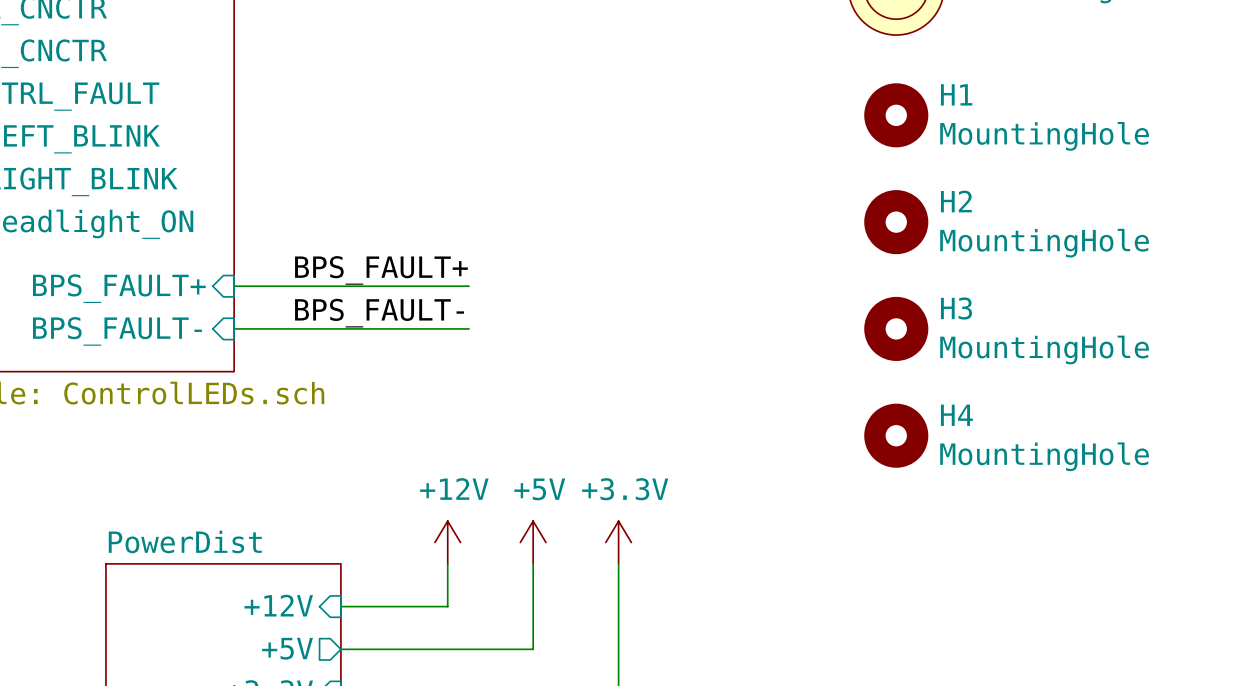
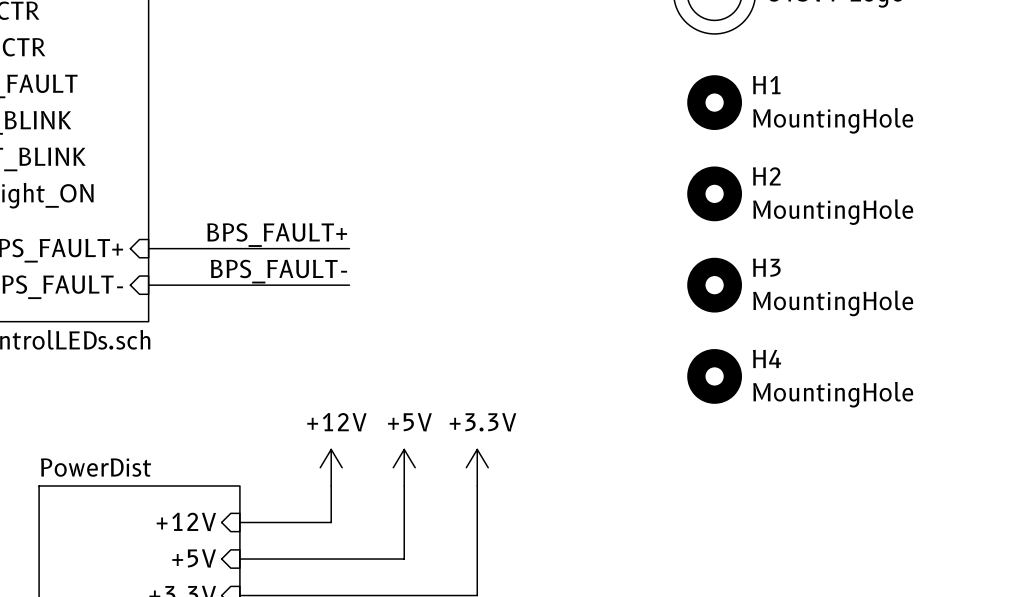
sheet pin shape: output (287, 648) -> input (194, 558)

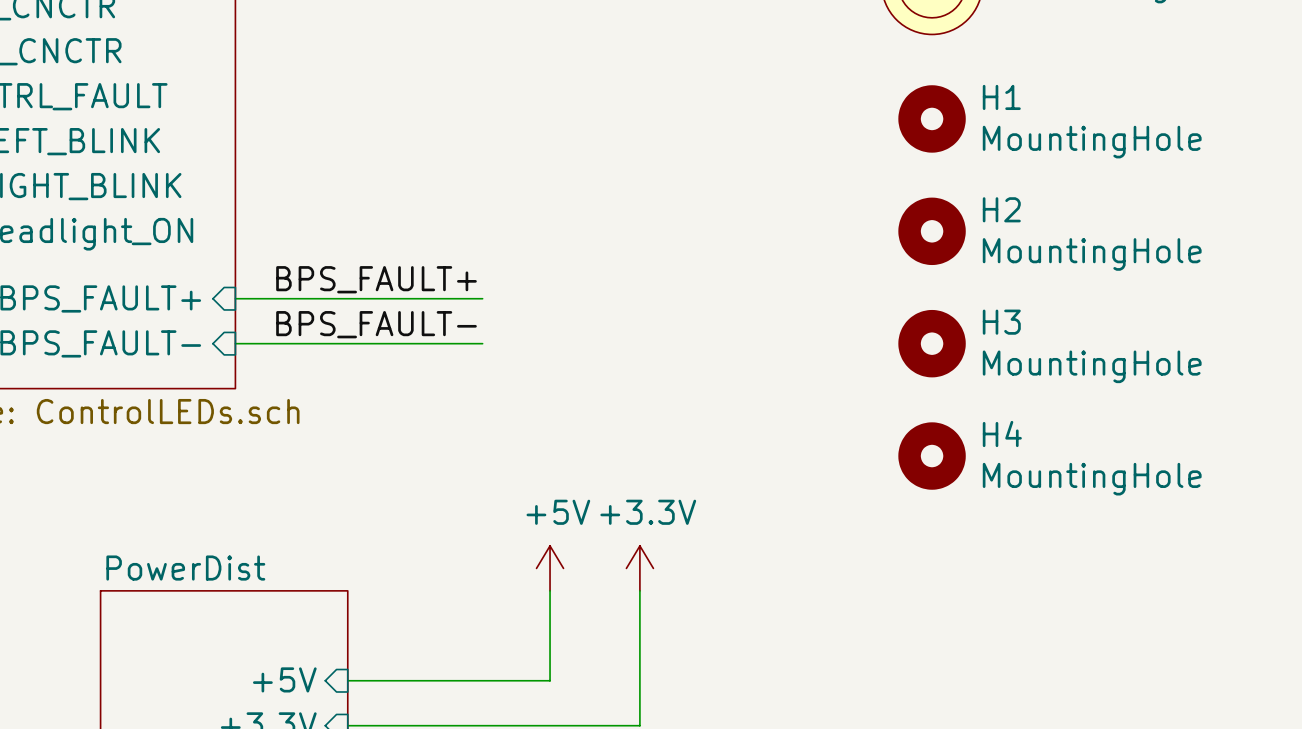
power symbol: +12V (331, 467) -> none
wire: (331, 485) (331, 522) (239, 522) -> none
sheet pin: +12V (186, 521) -> none

